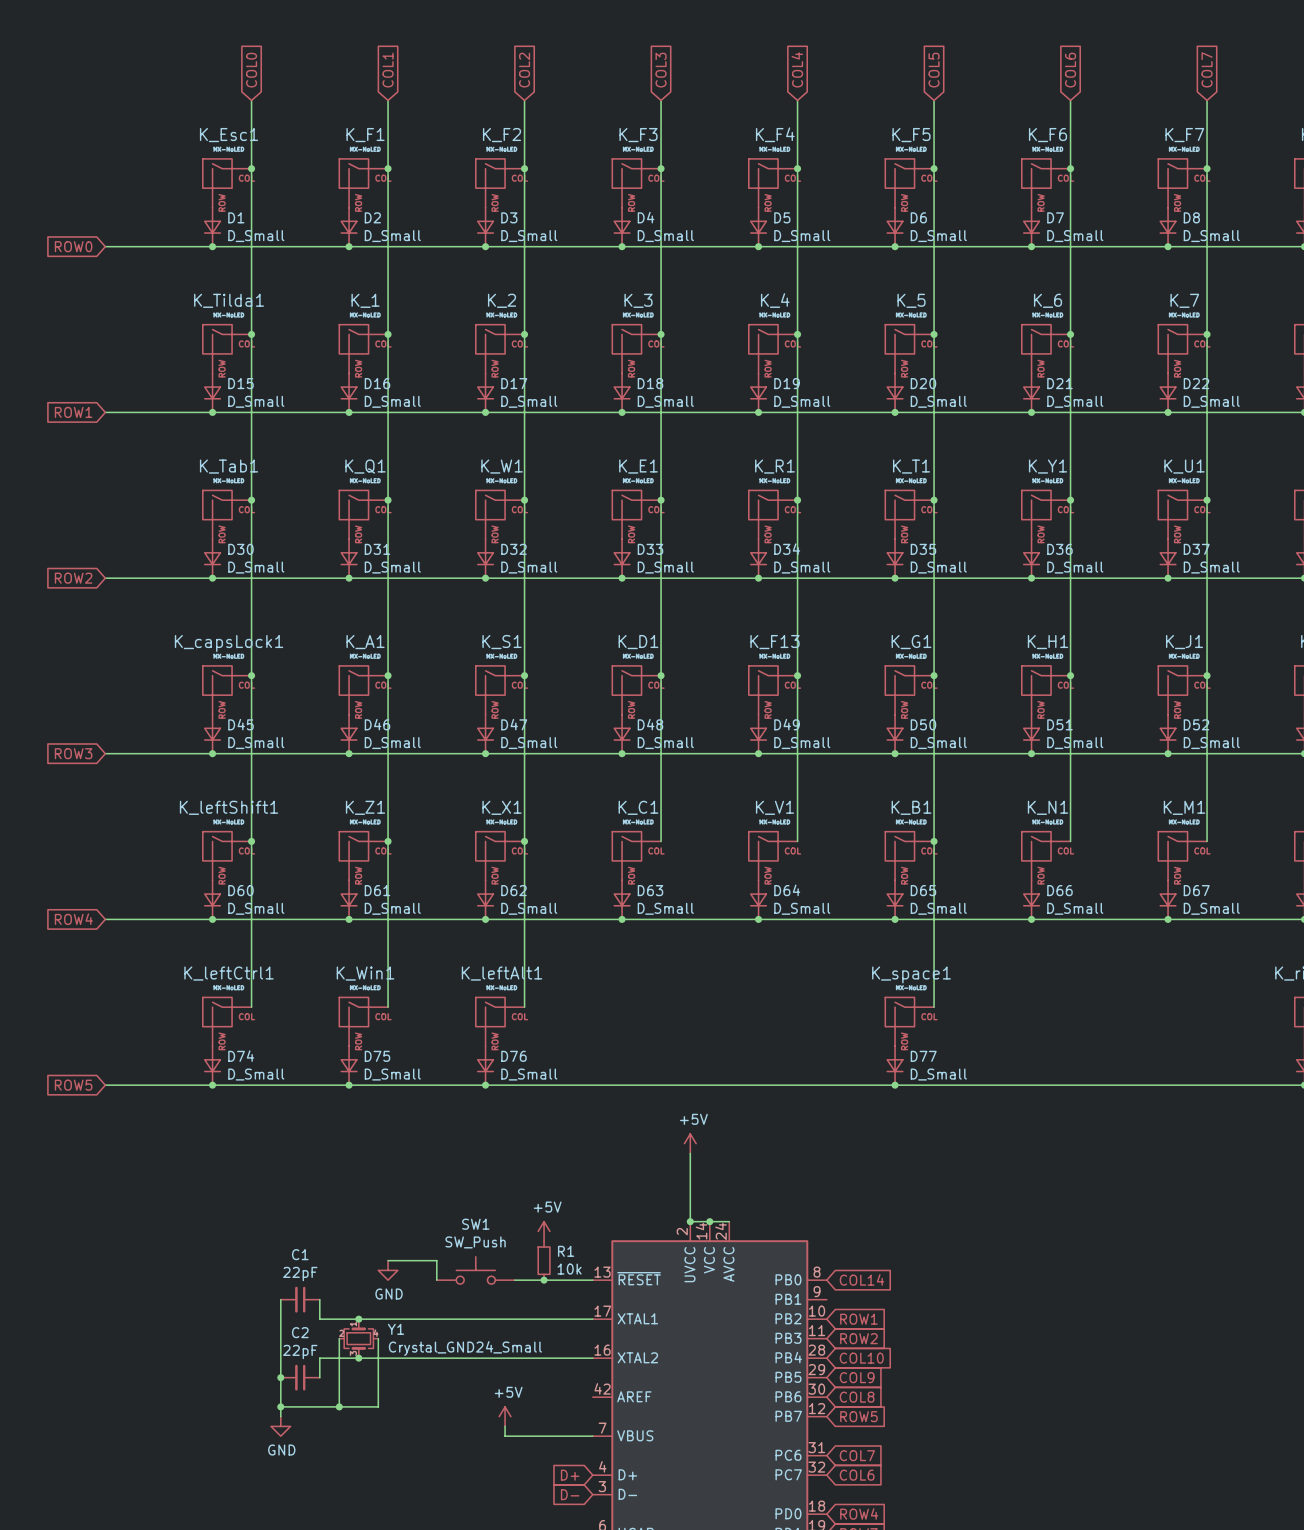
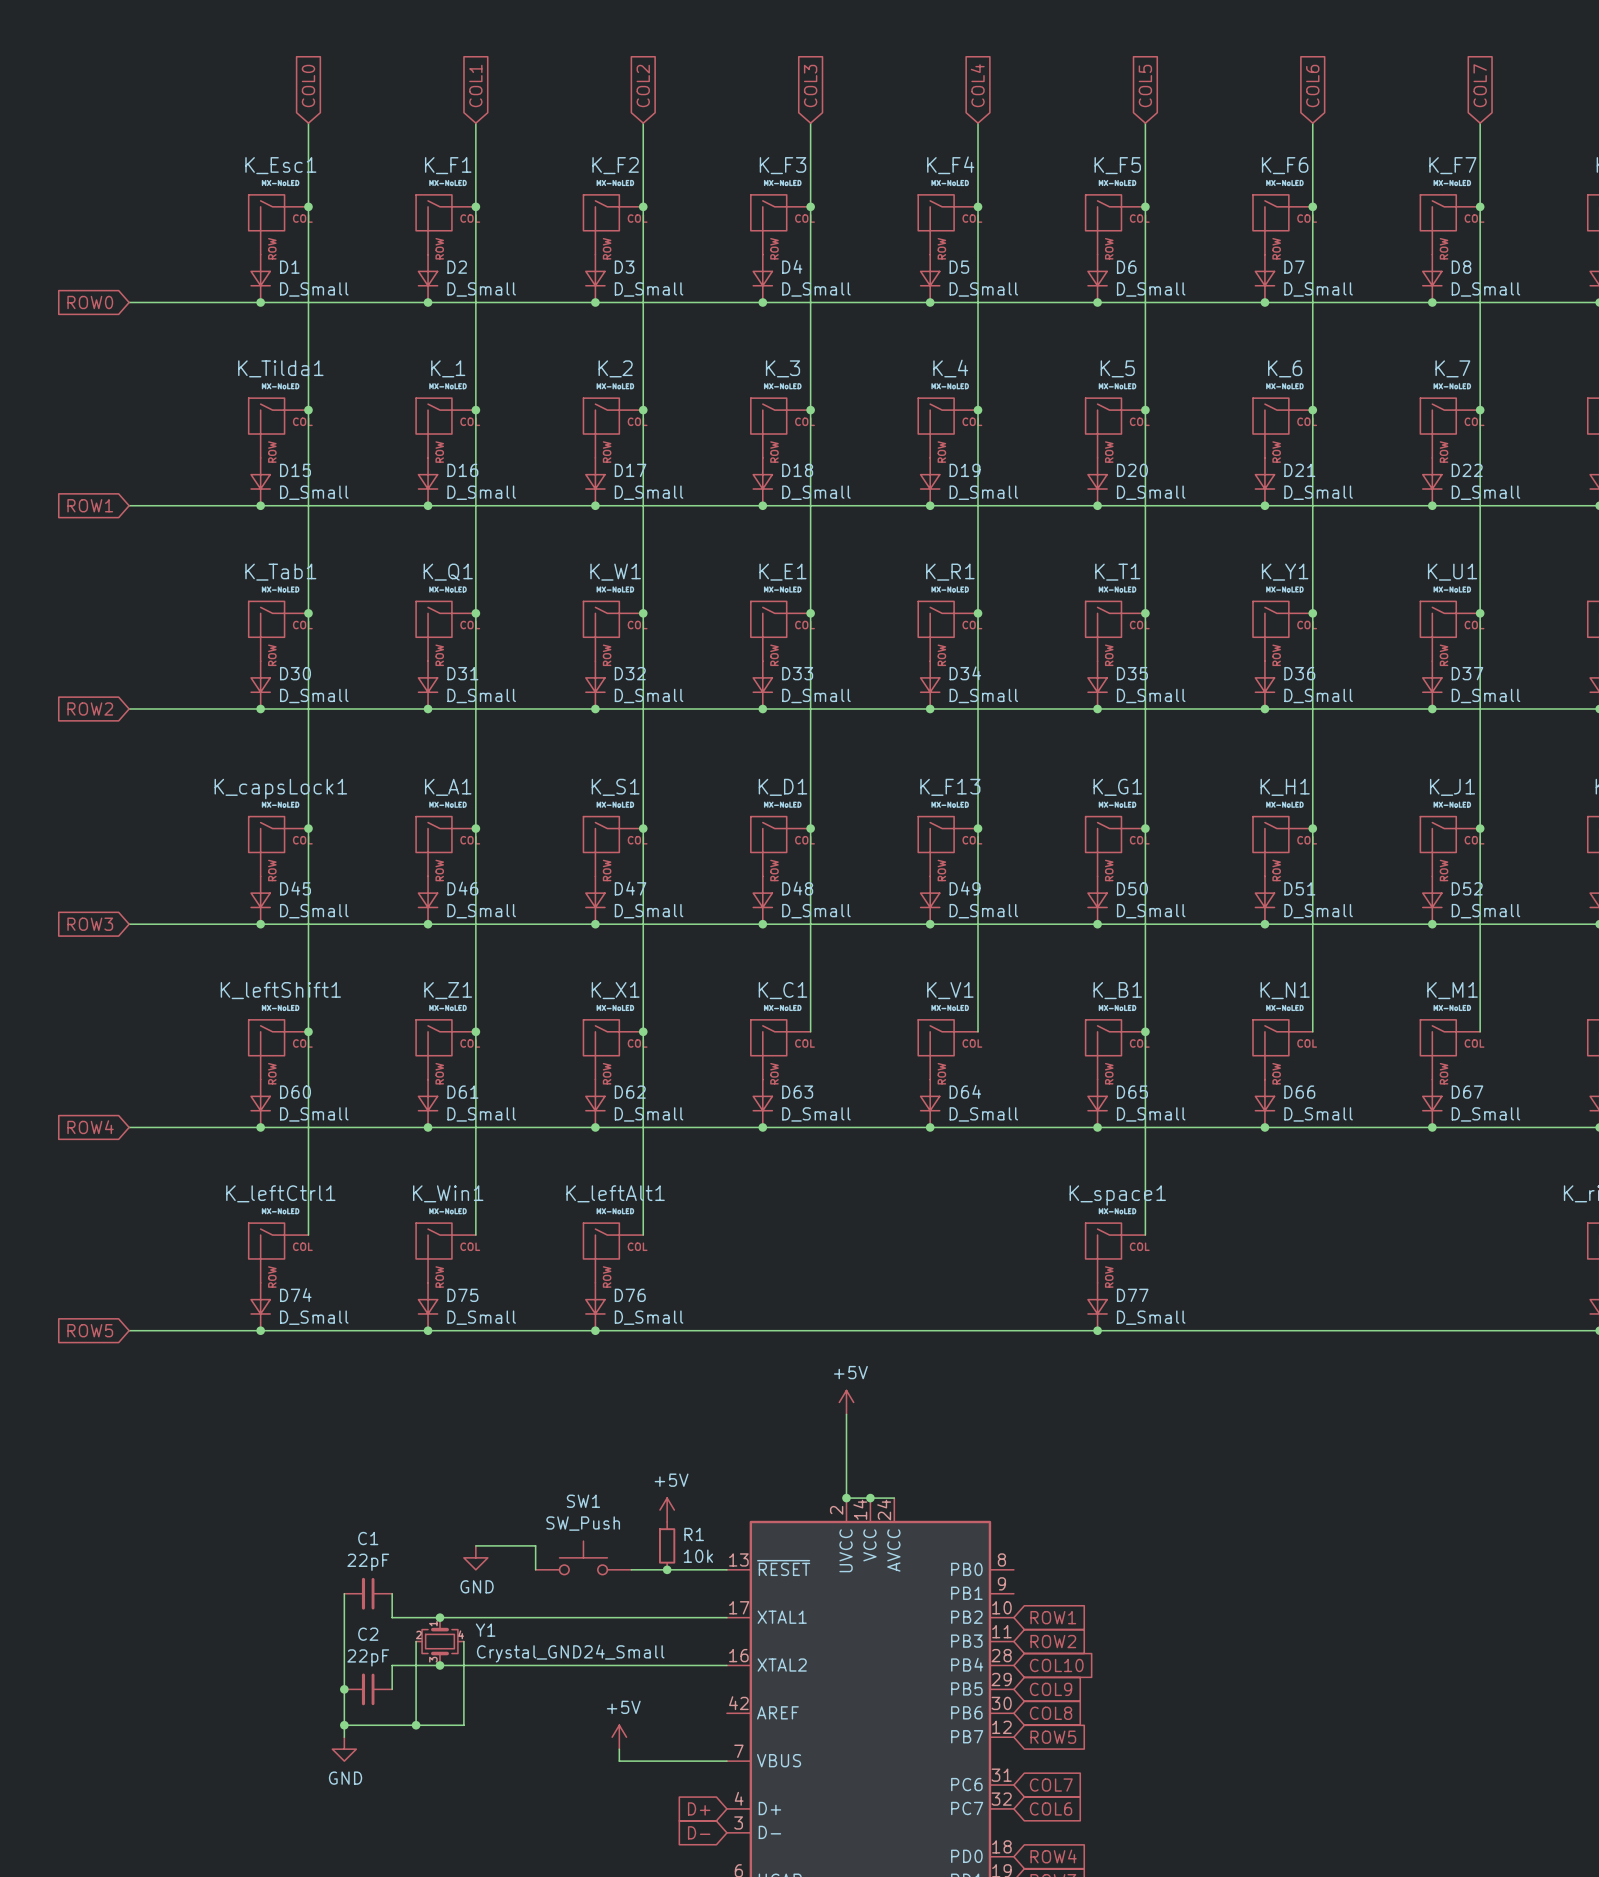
global label: COL14 (861, 1279) -> none

